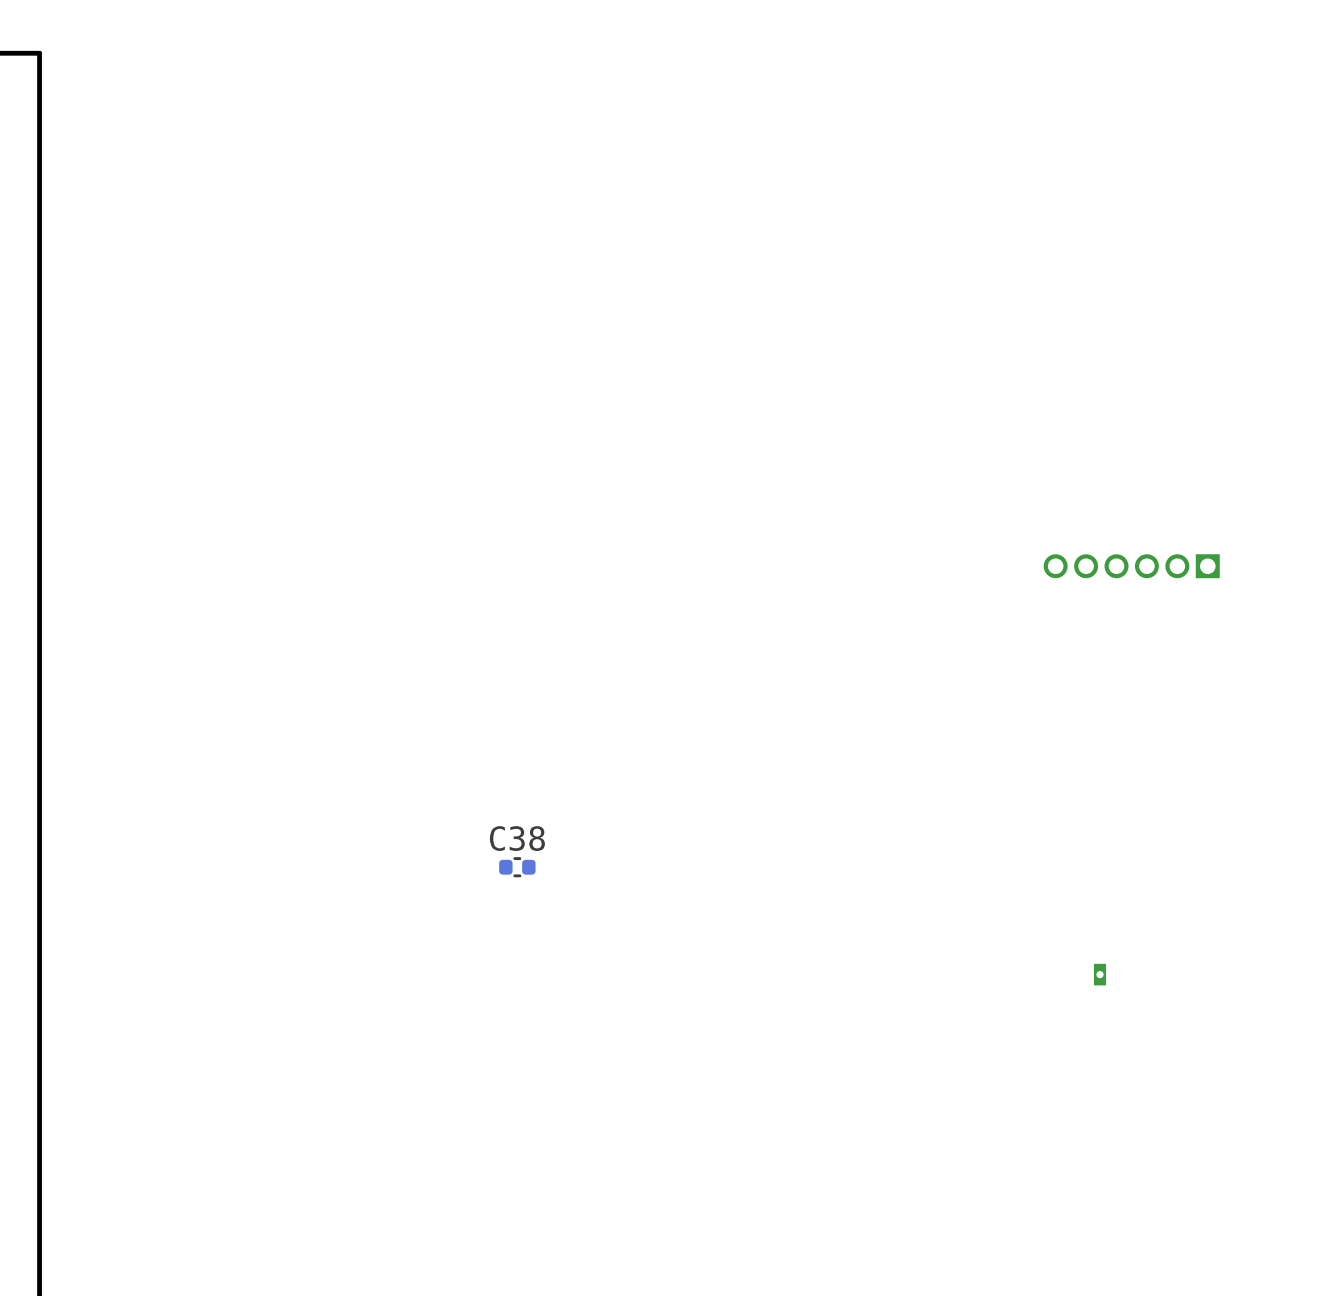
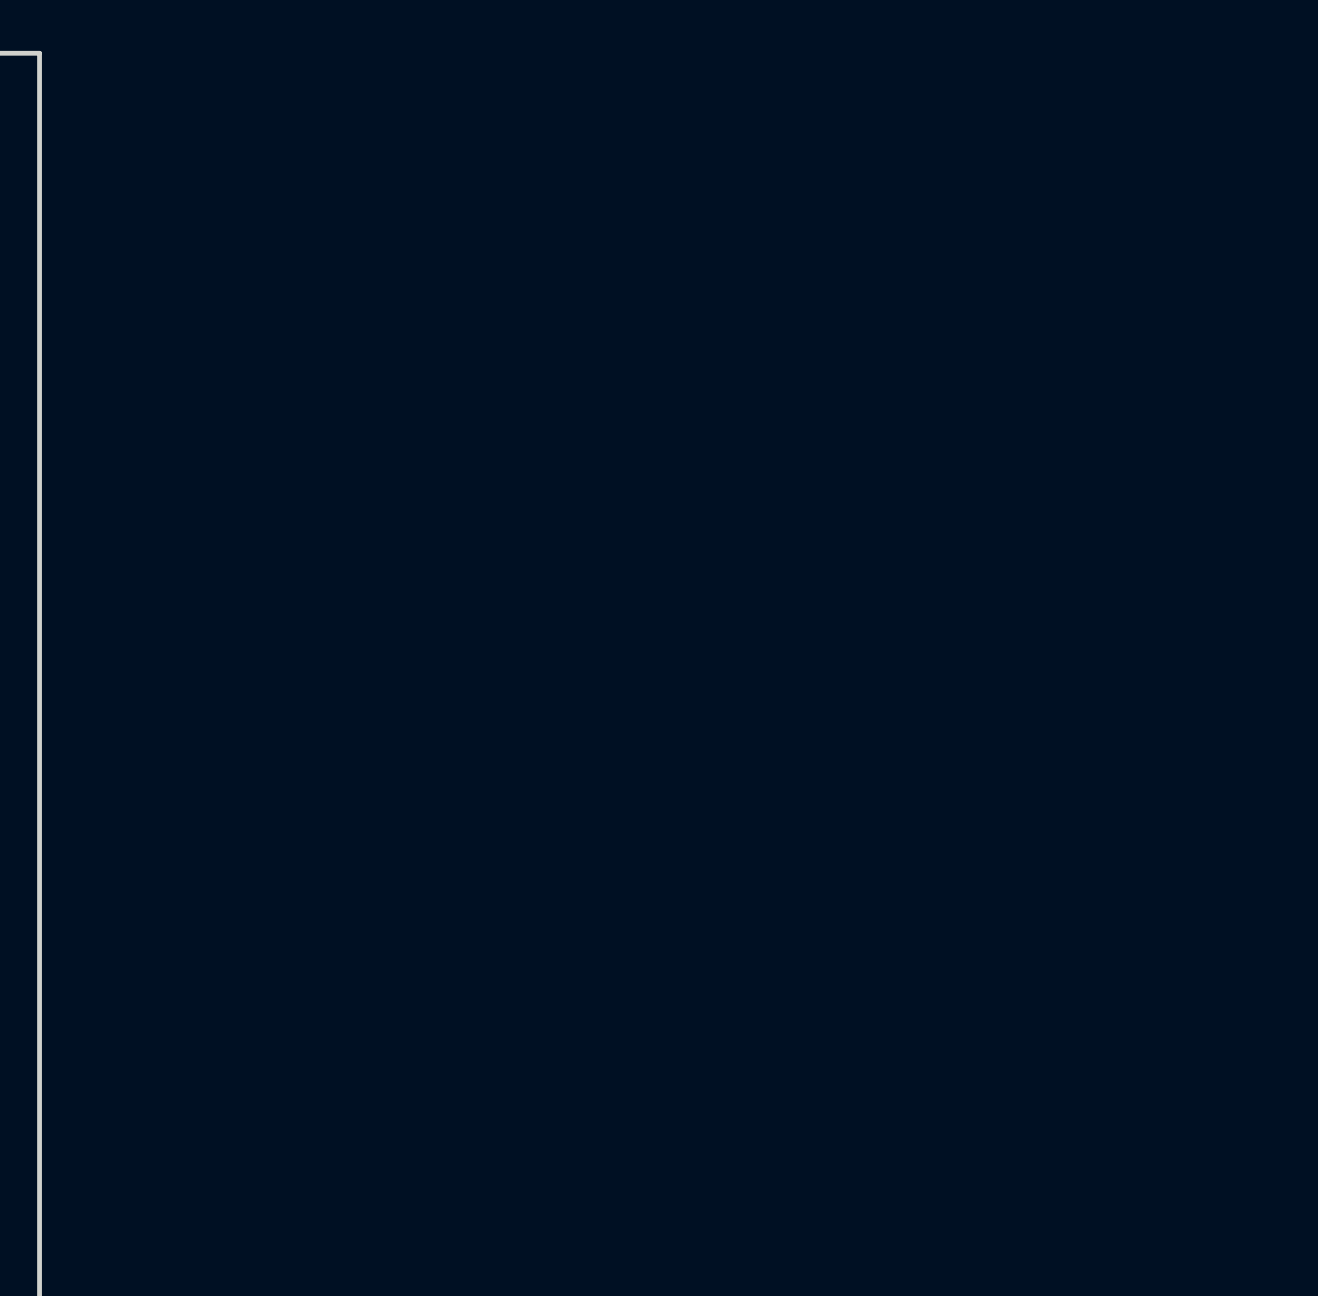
part: (1131, 566) -> none
C38: (517, 867) -> none
part: (1099, 974) -> none

